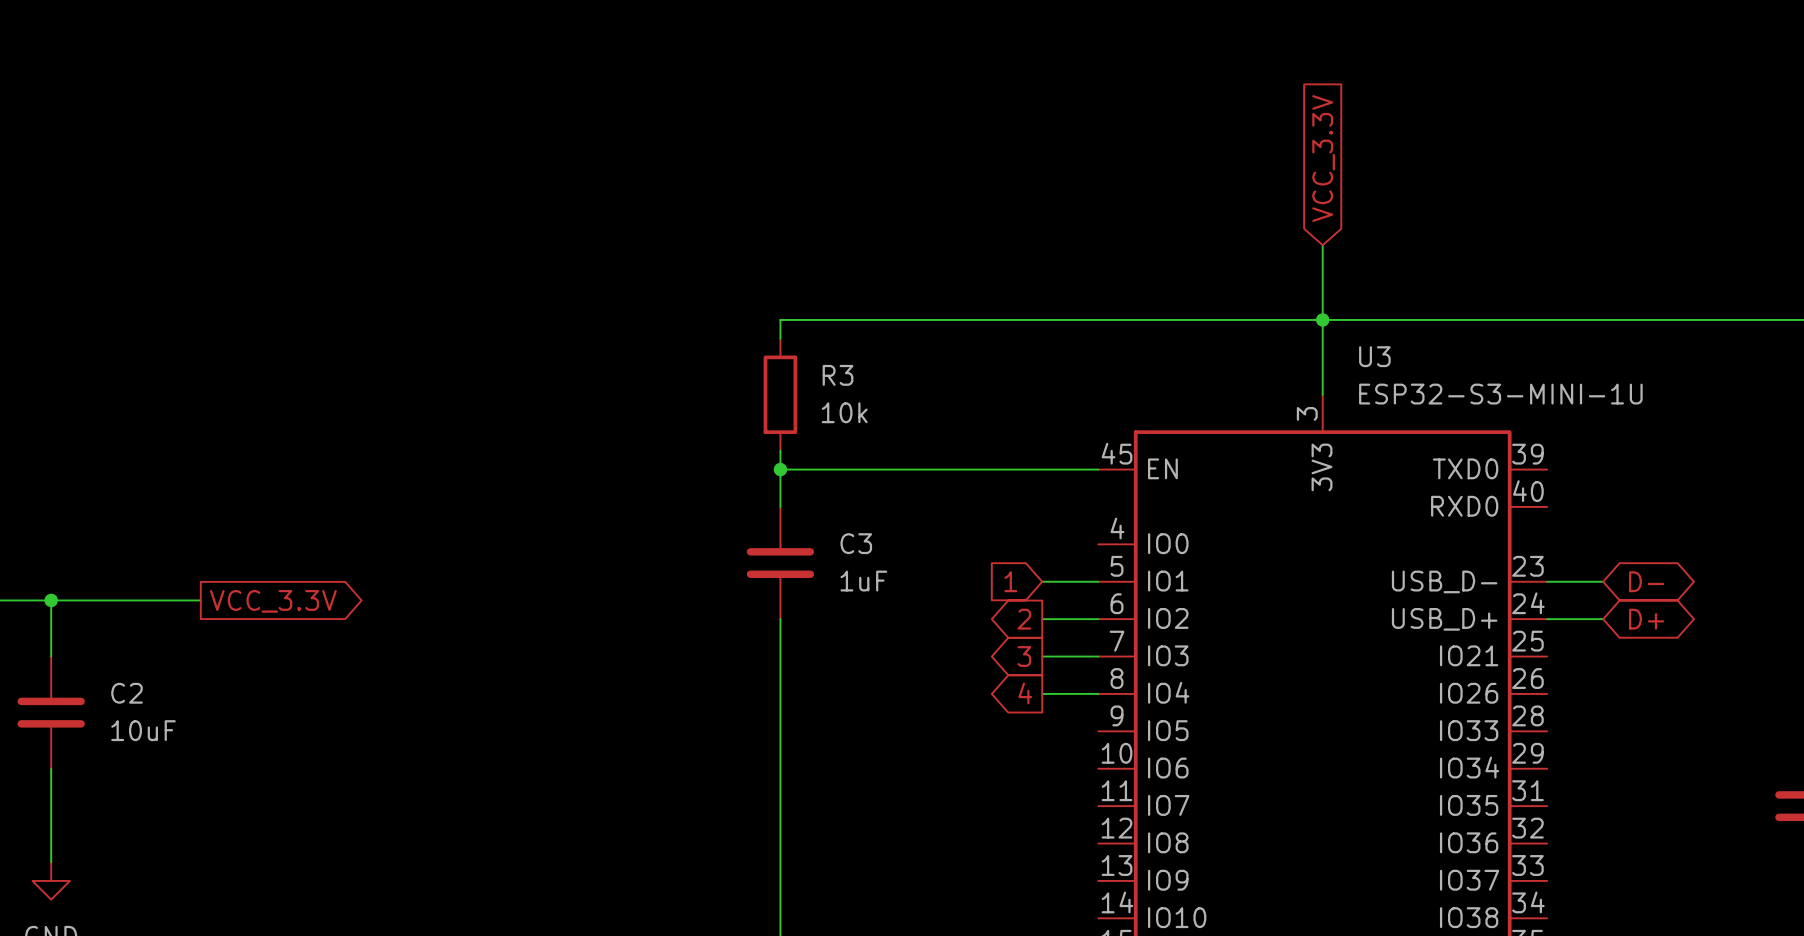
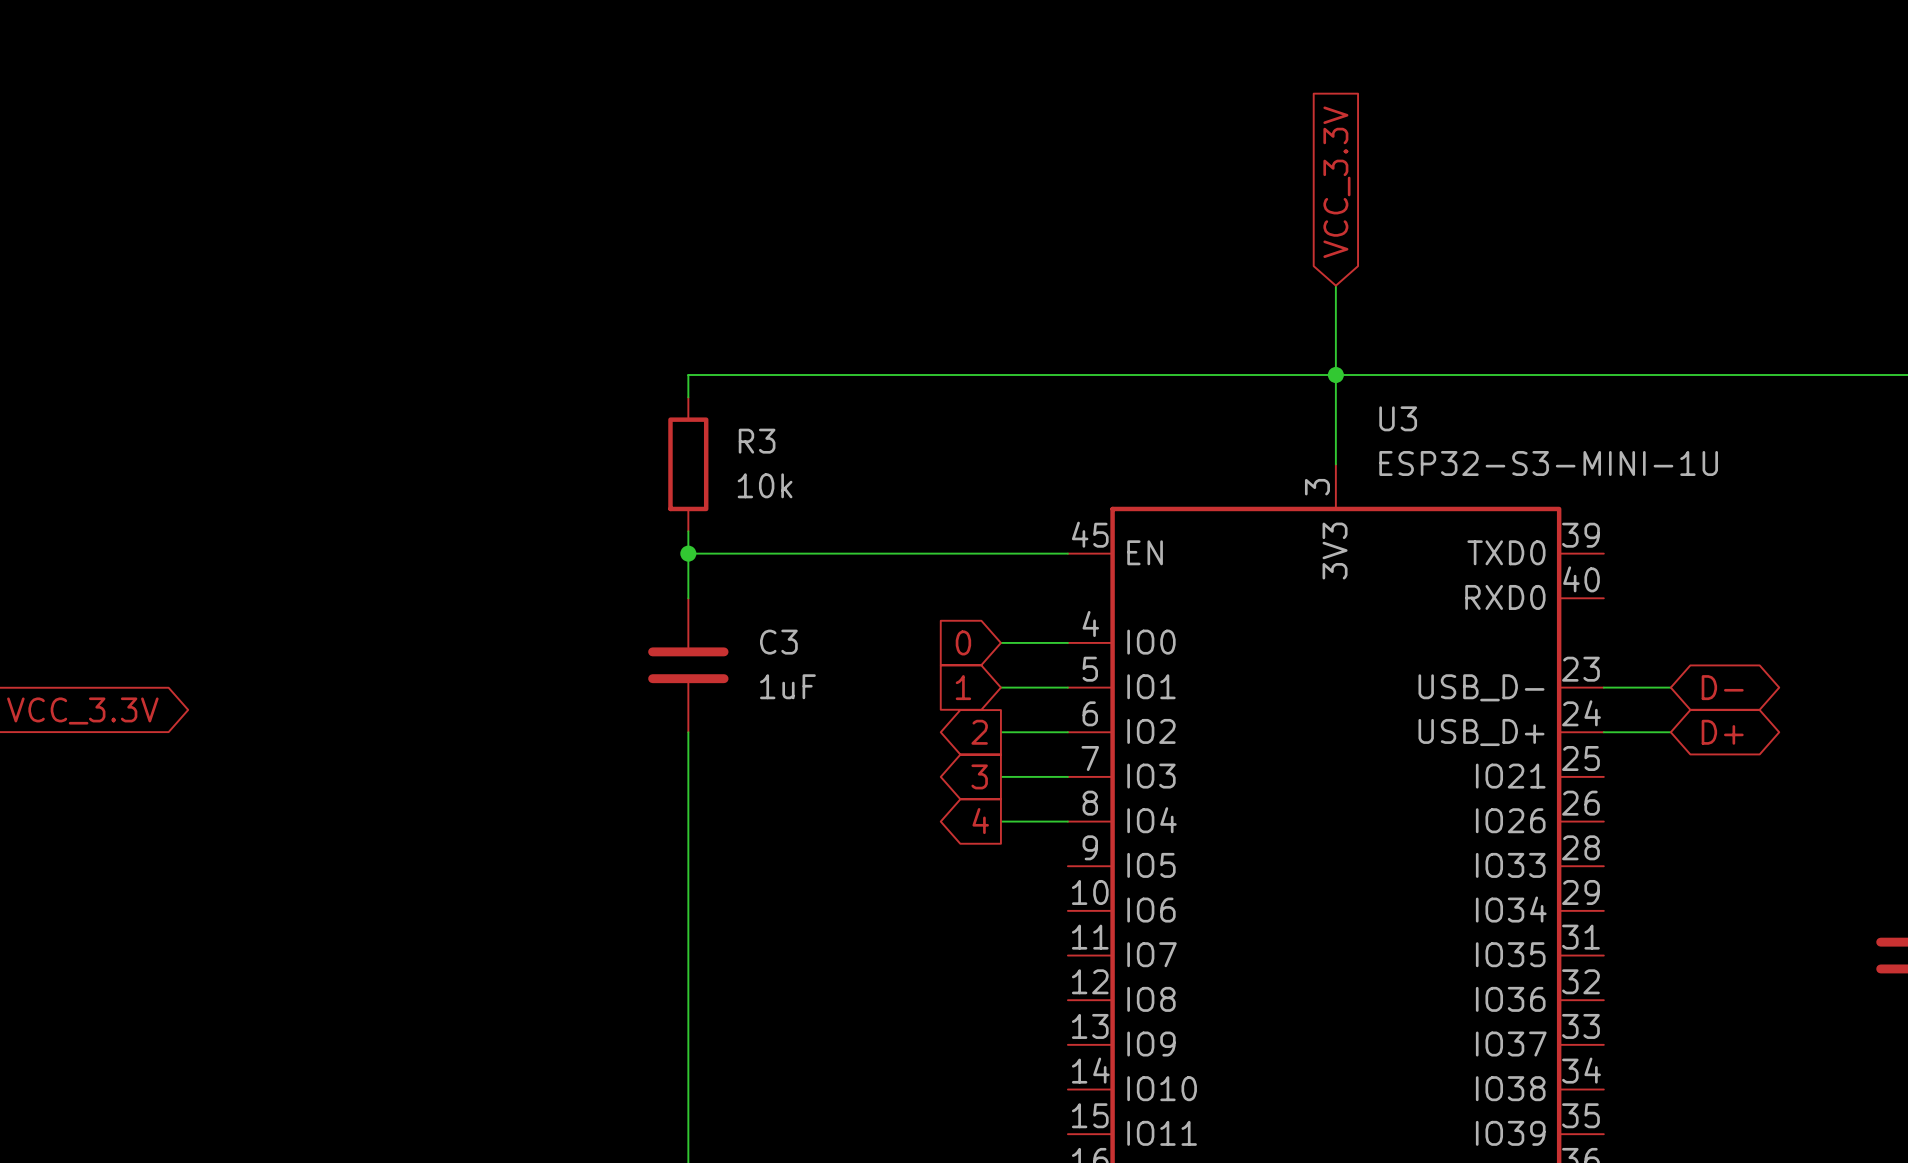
global label: none -> 0 (963, 642)
wire: none -> (1000, 642) (1067, 642)

